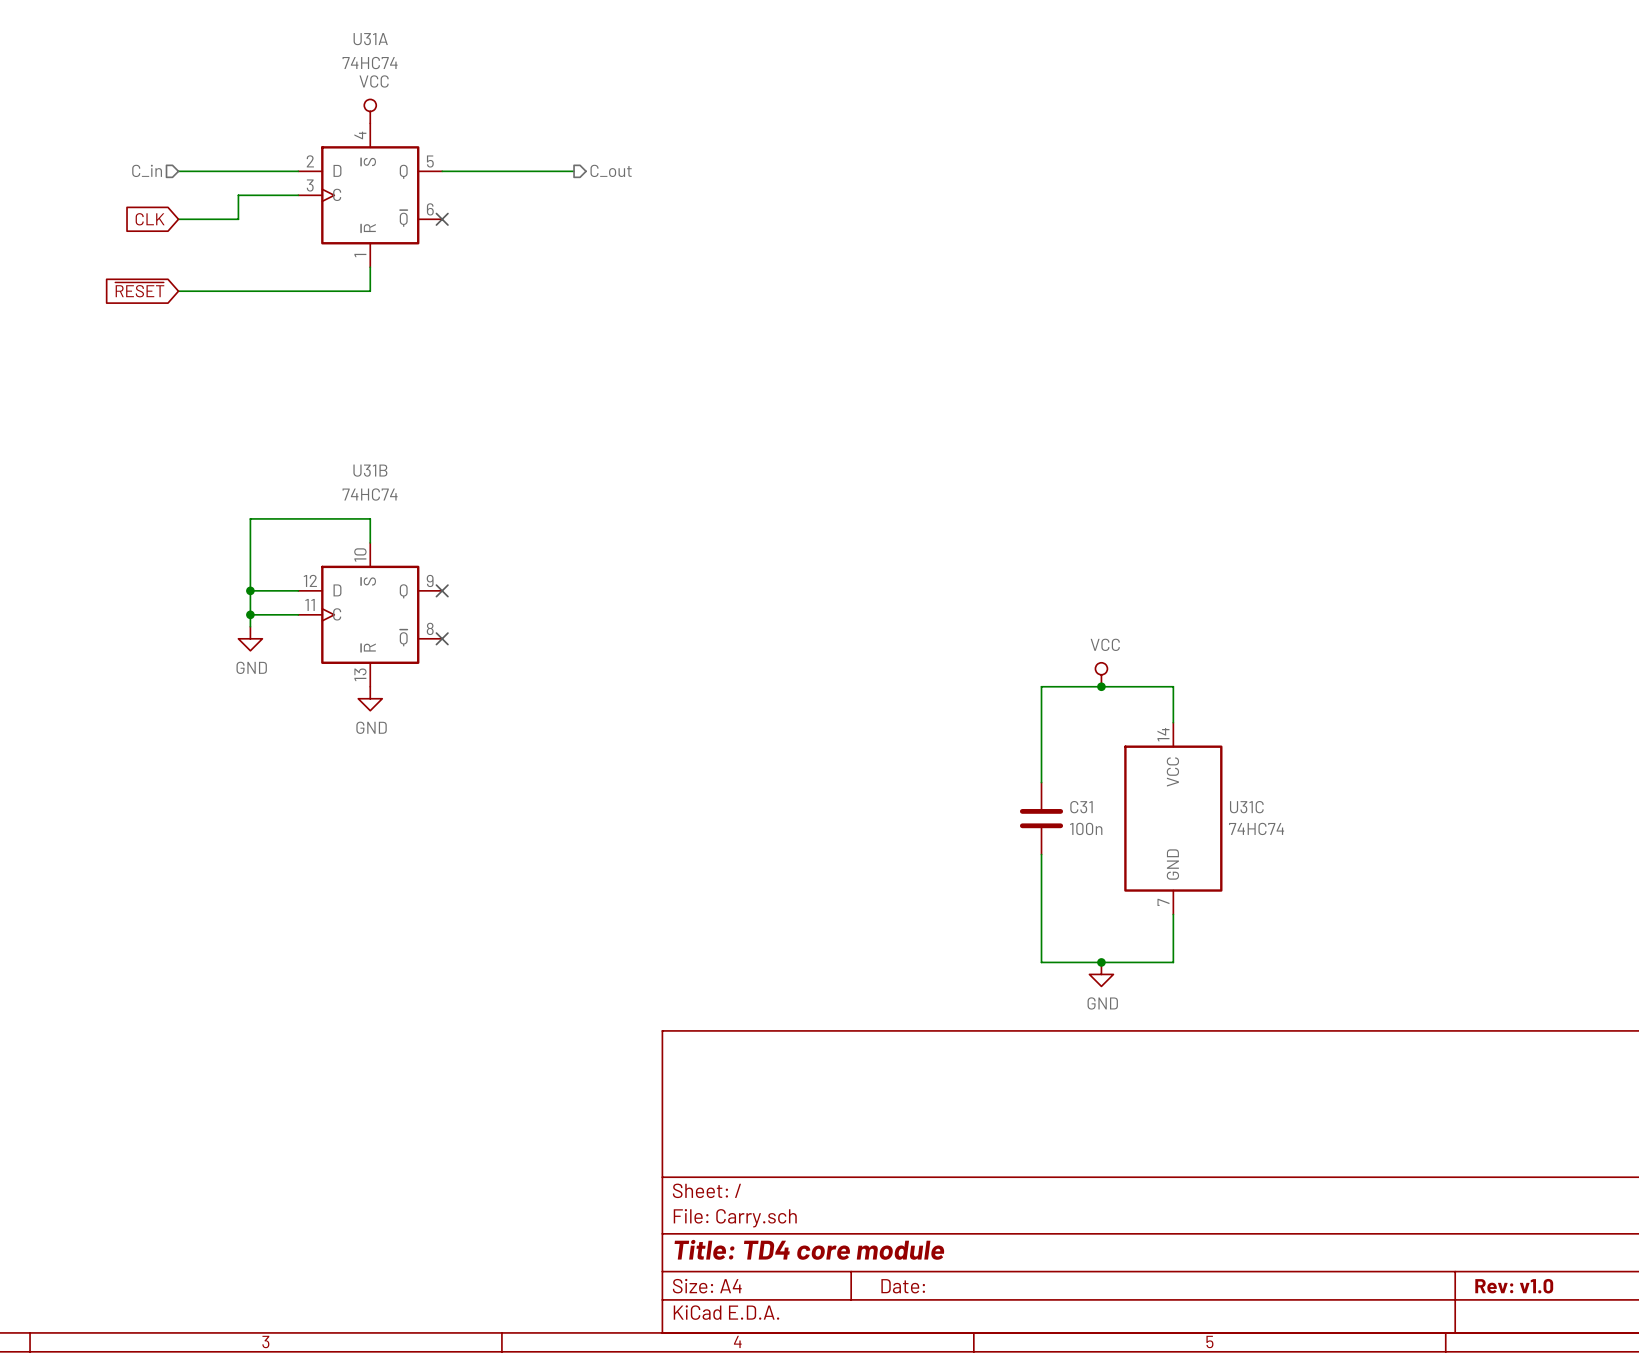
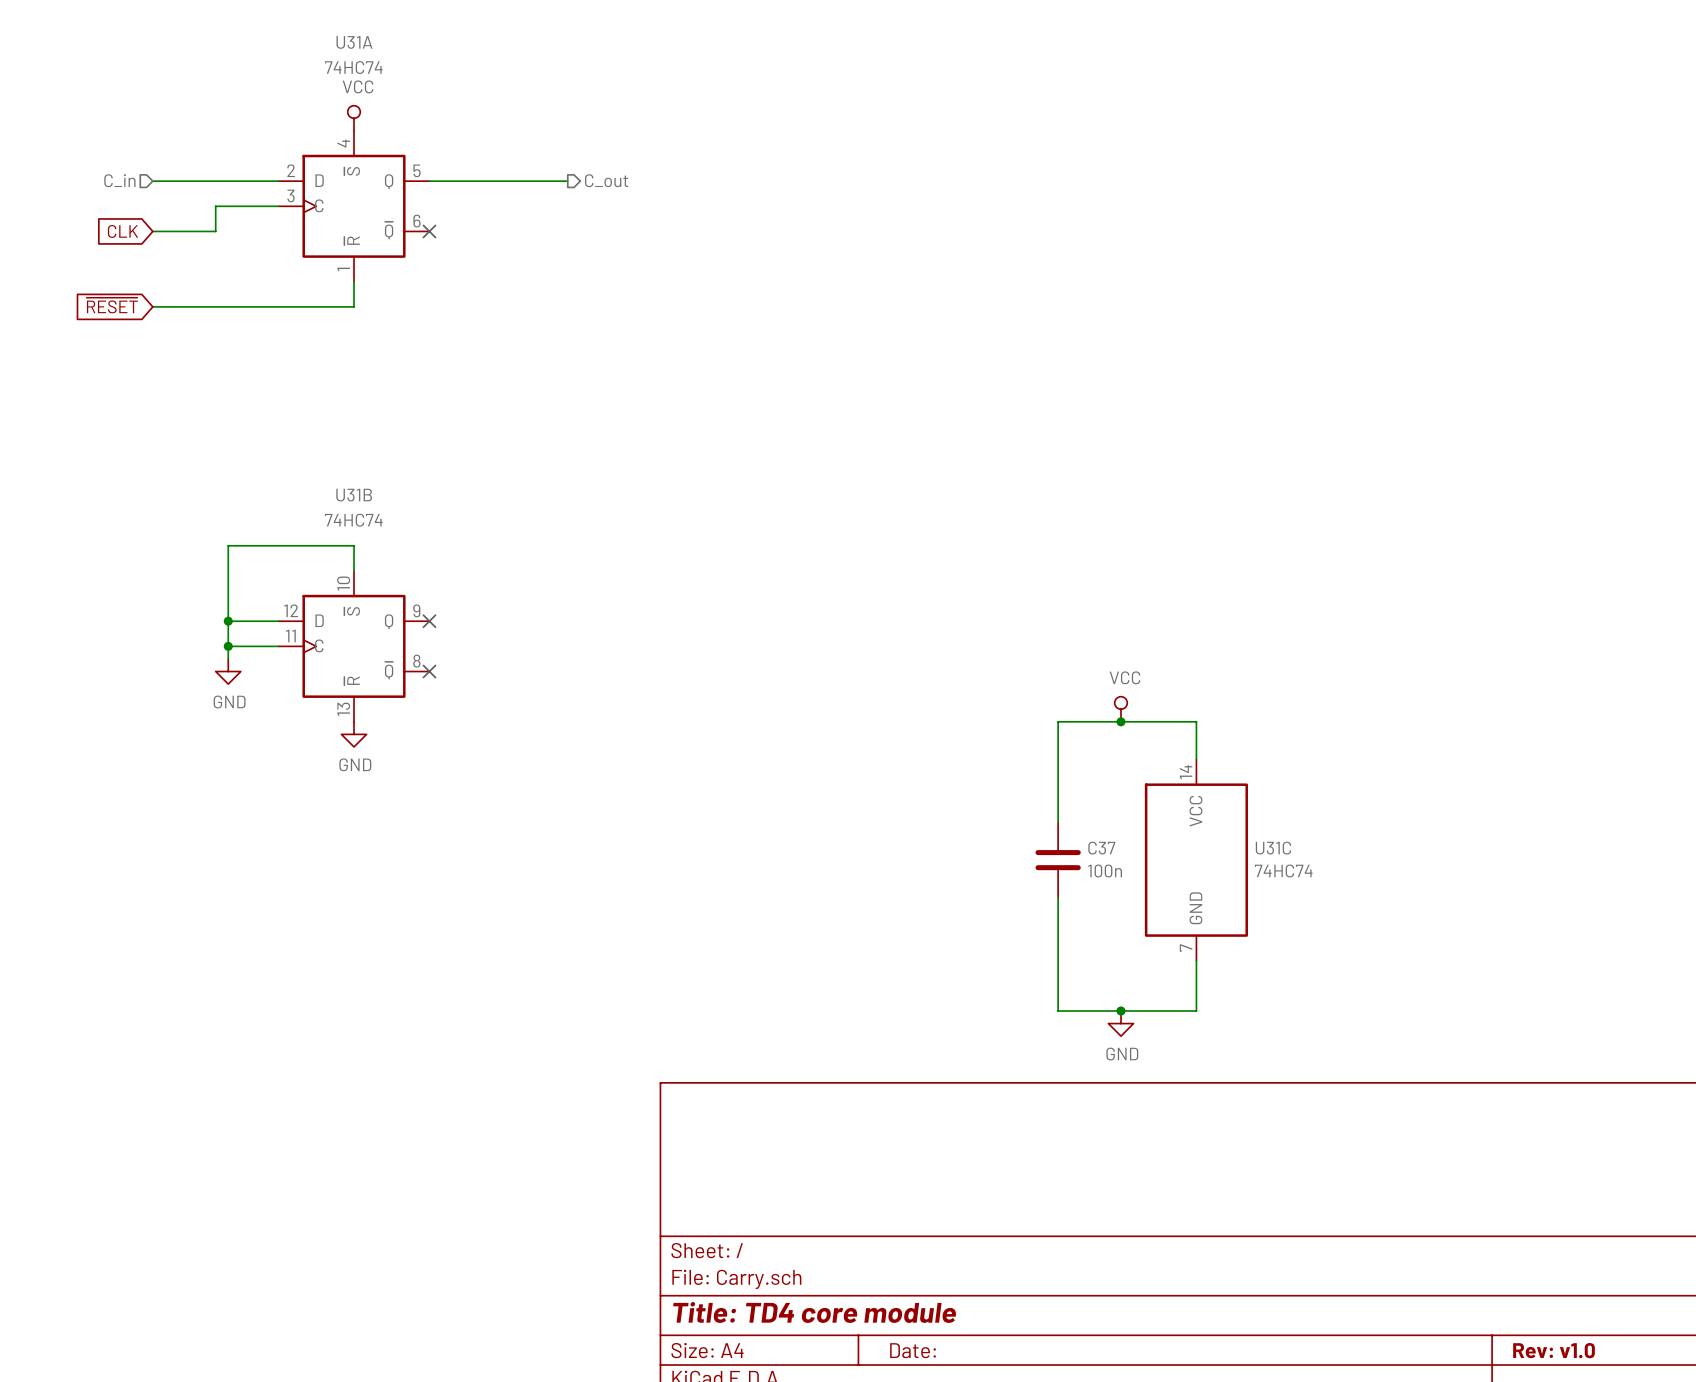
C31 name: C31 (1081, 807) -> C37 (1101, 848)

